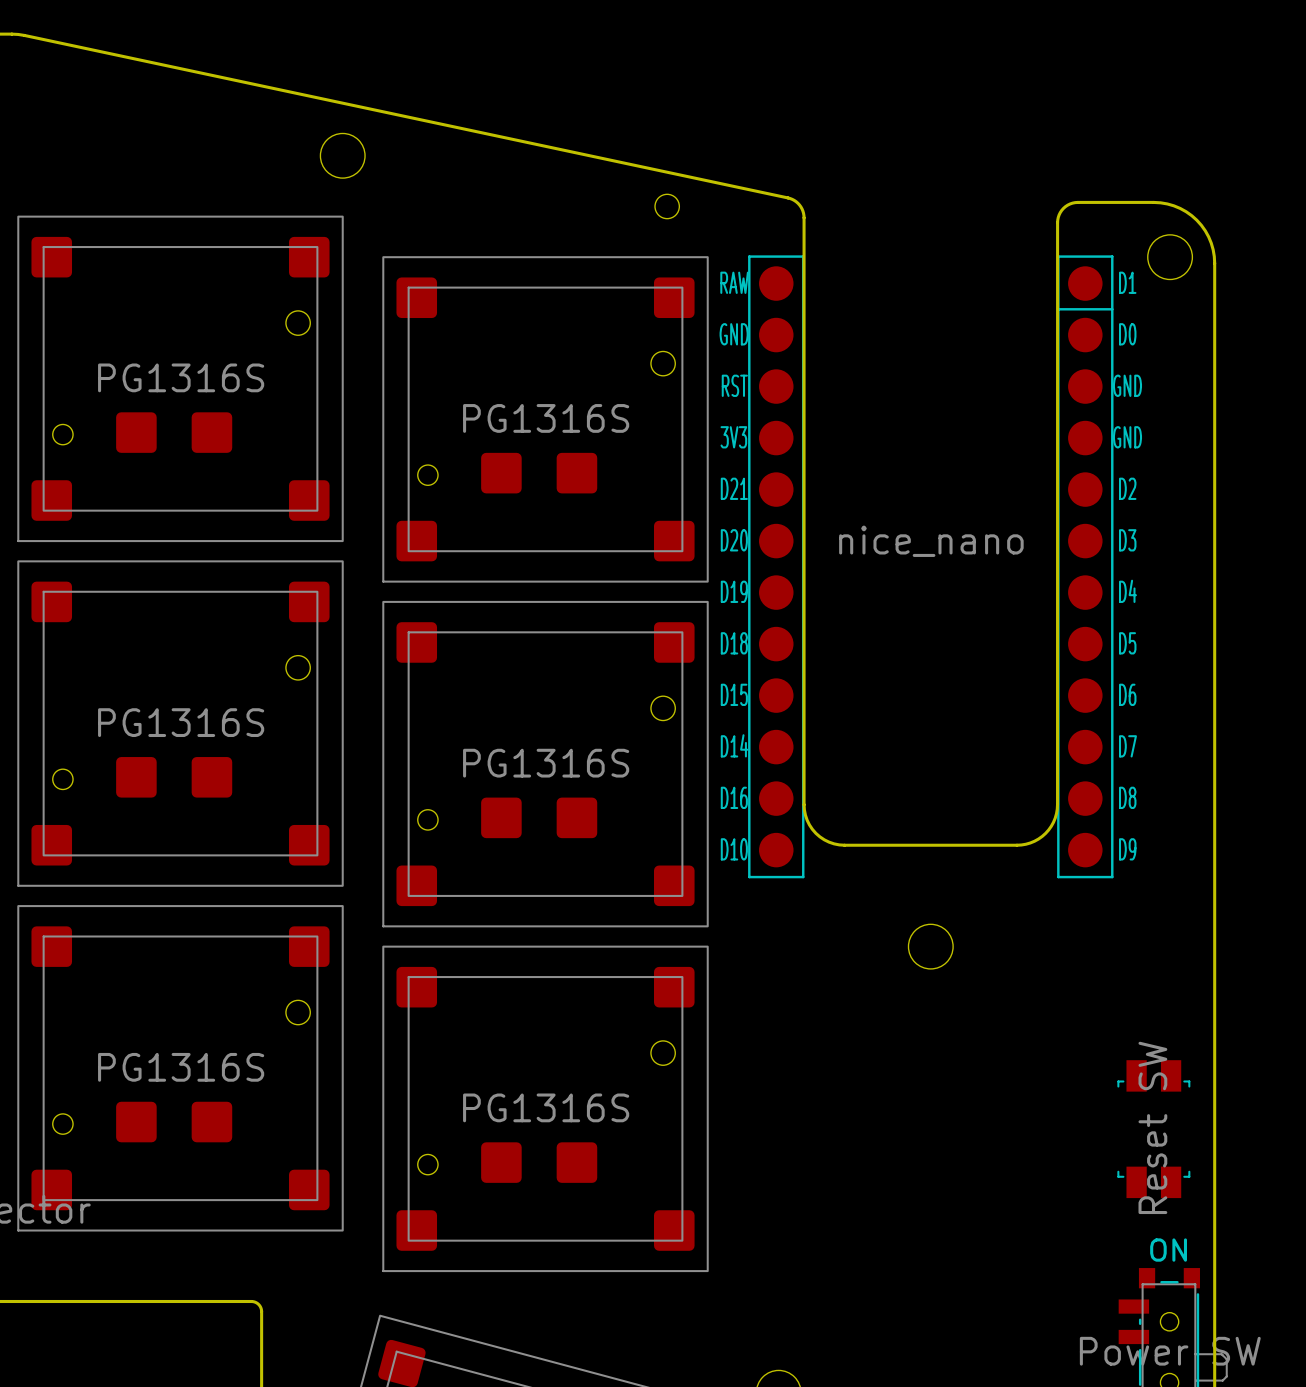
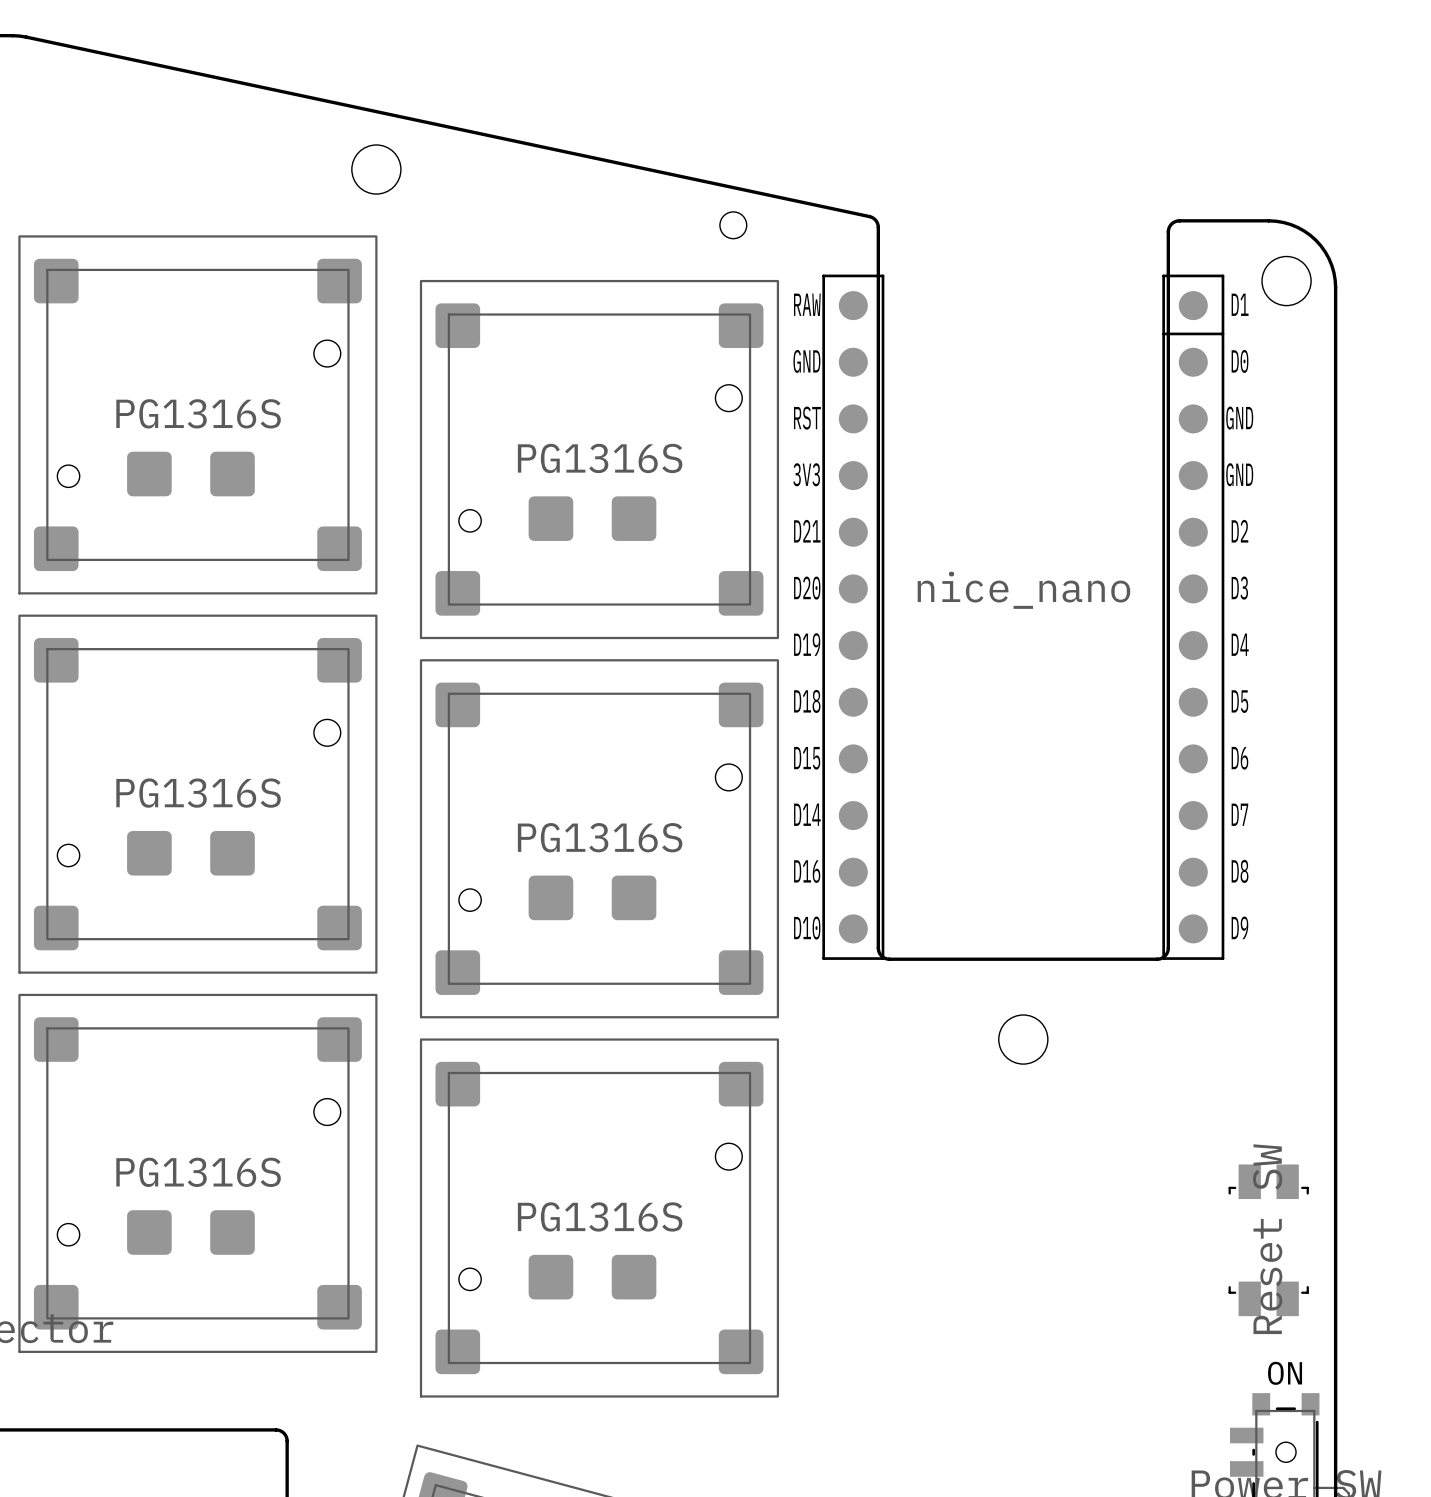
board edge: (788, 197) (799, 205) (804, 217) (804, 809) (807, 820) (815, 833) (829, 842) (844, 845) (1021, 844) (1034, 841) (1042, 836) (1051, 826) (1055, 818) (1057, 804) (1057, 222) (1059, 214) (1063, 208) (1070, 203) (1077, 202) -> (866, 215) (874, 219) (878, 227) (878, 948) (881, 955) (889, 959) (1157, 959) (1164, 956) (1167, 951) (1168, 231) (1173, 222) (1185, 220)
part footprint: [748, 255, 1114, 879] -> [822, 274, 1225, 960]

